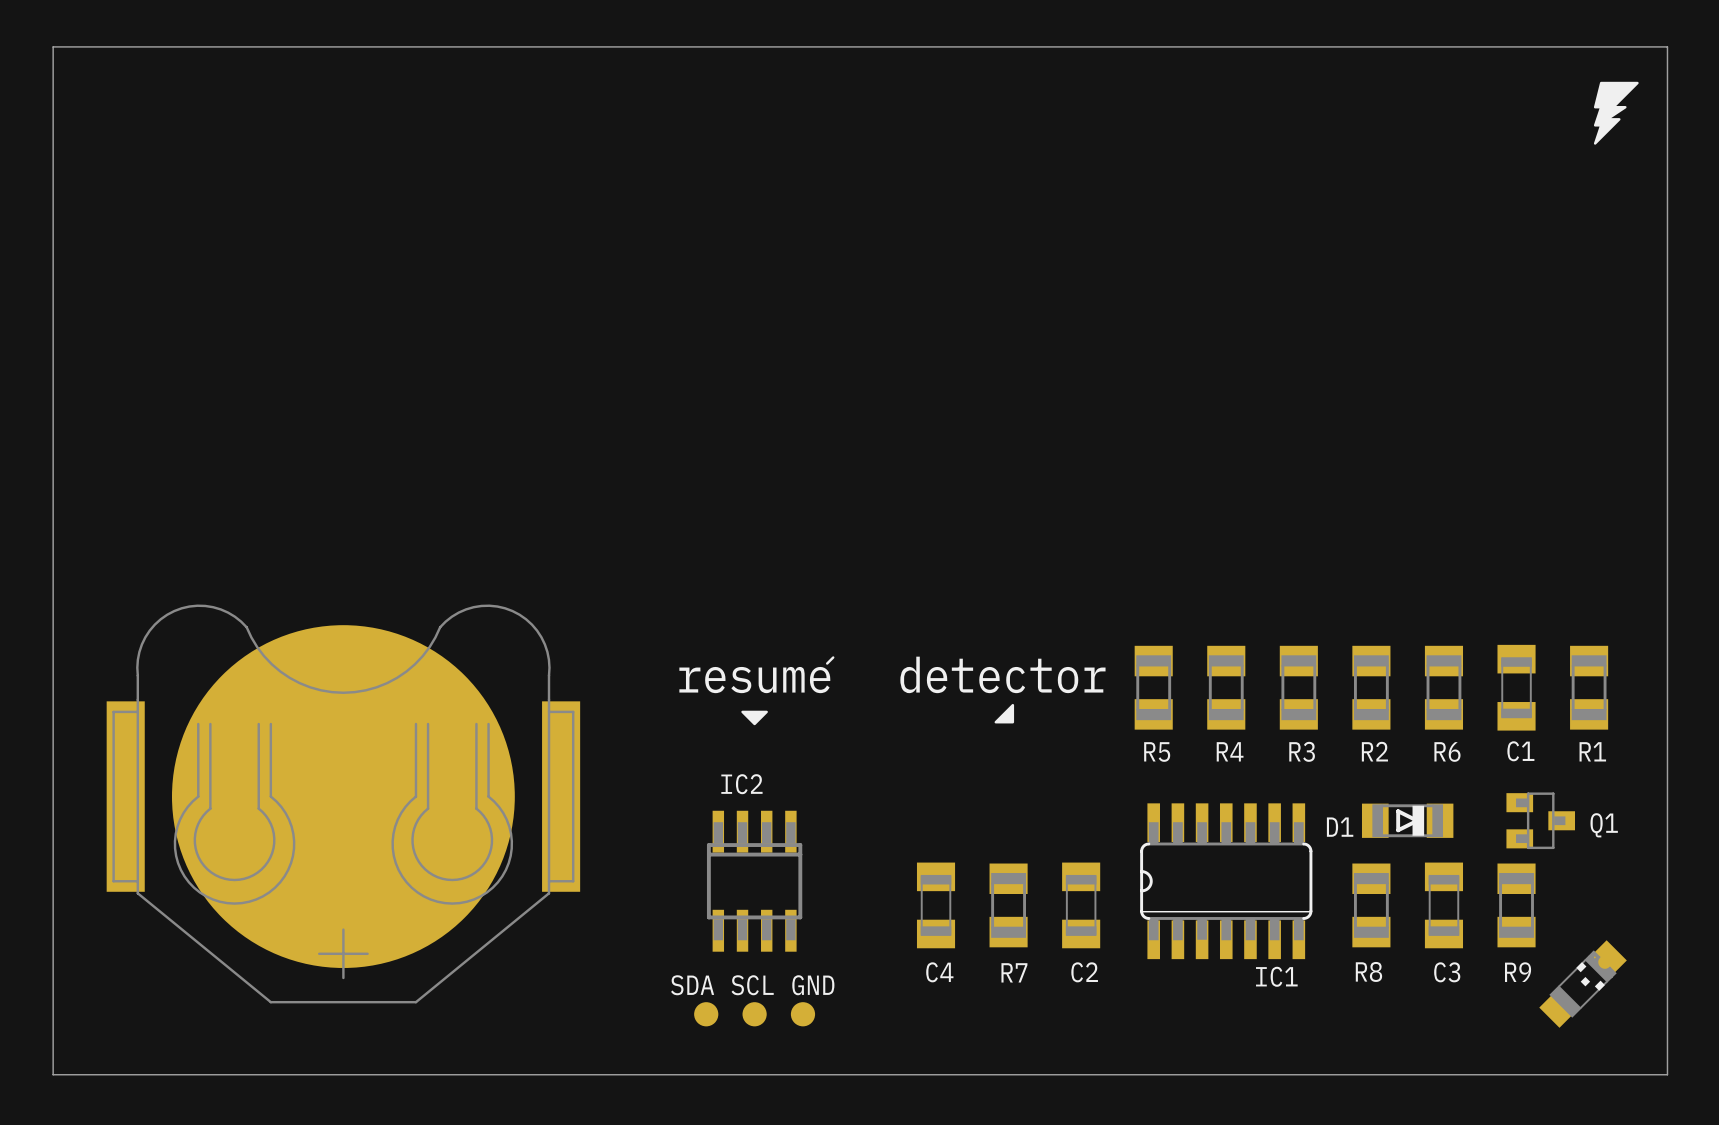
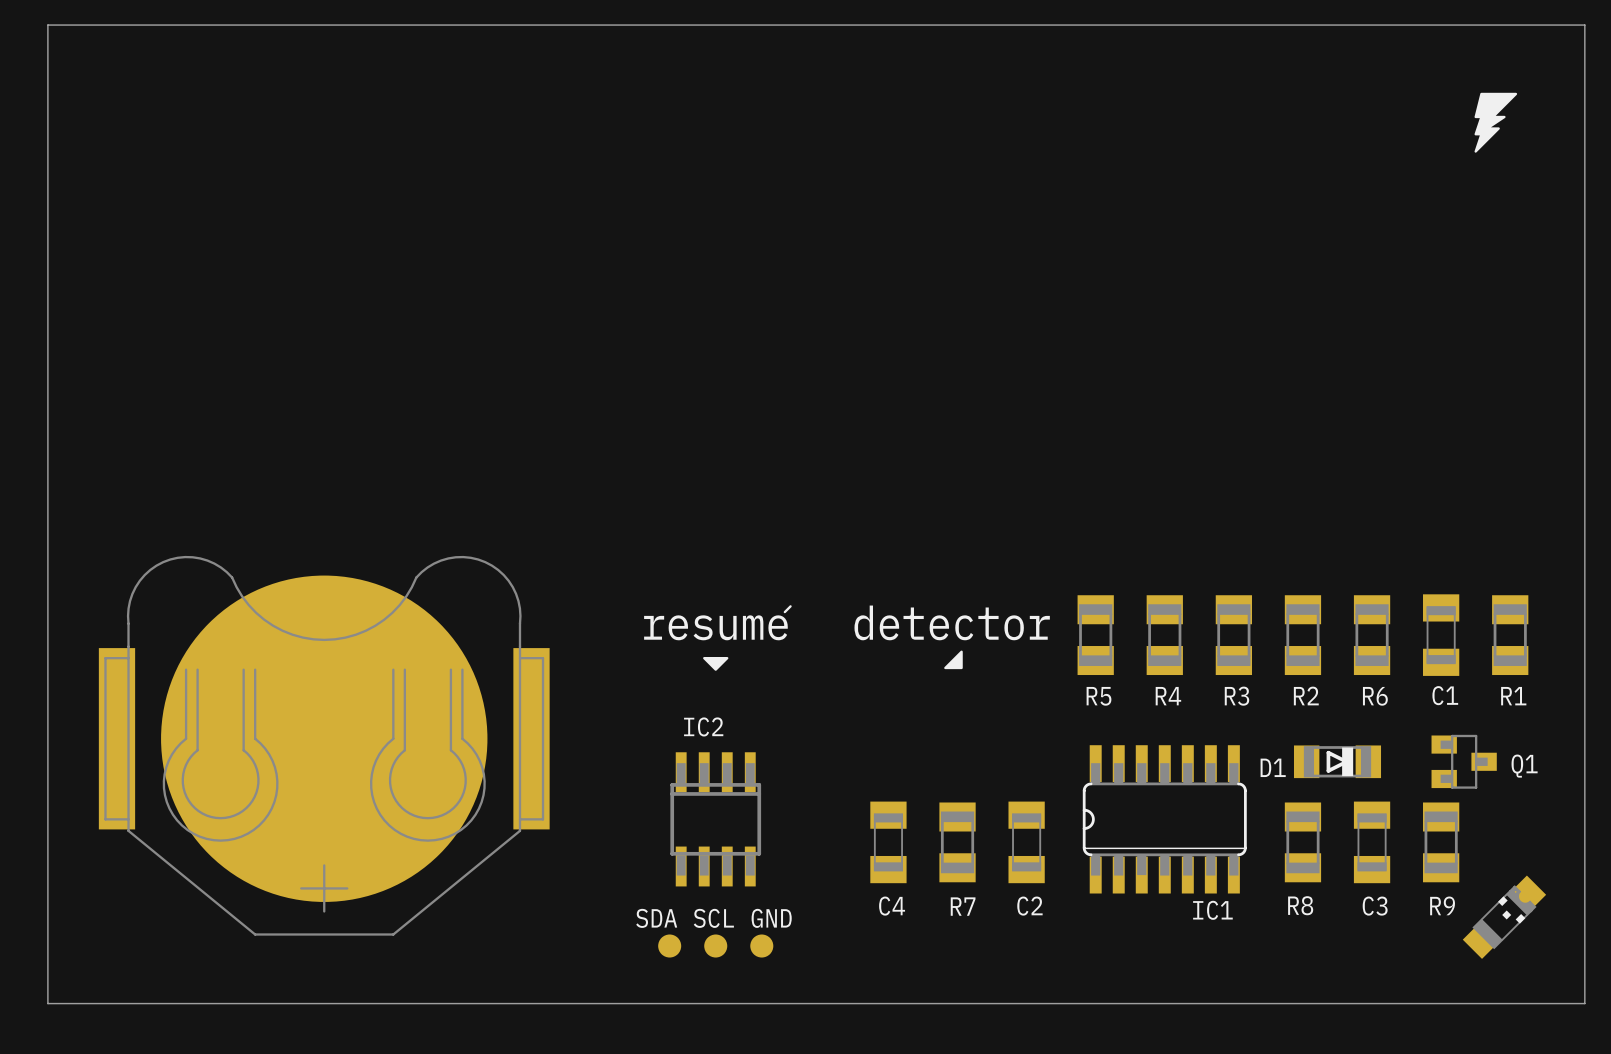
drawing position: (1616, 113) -> (1495, 122)

